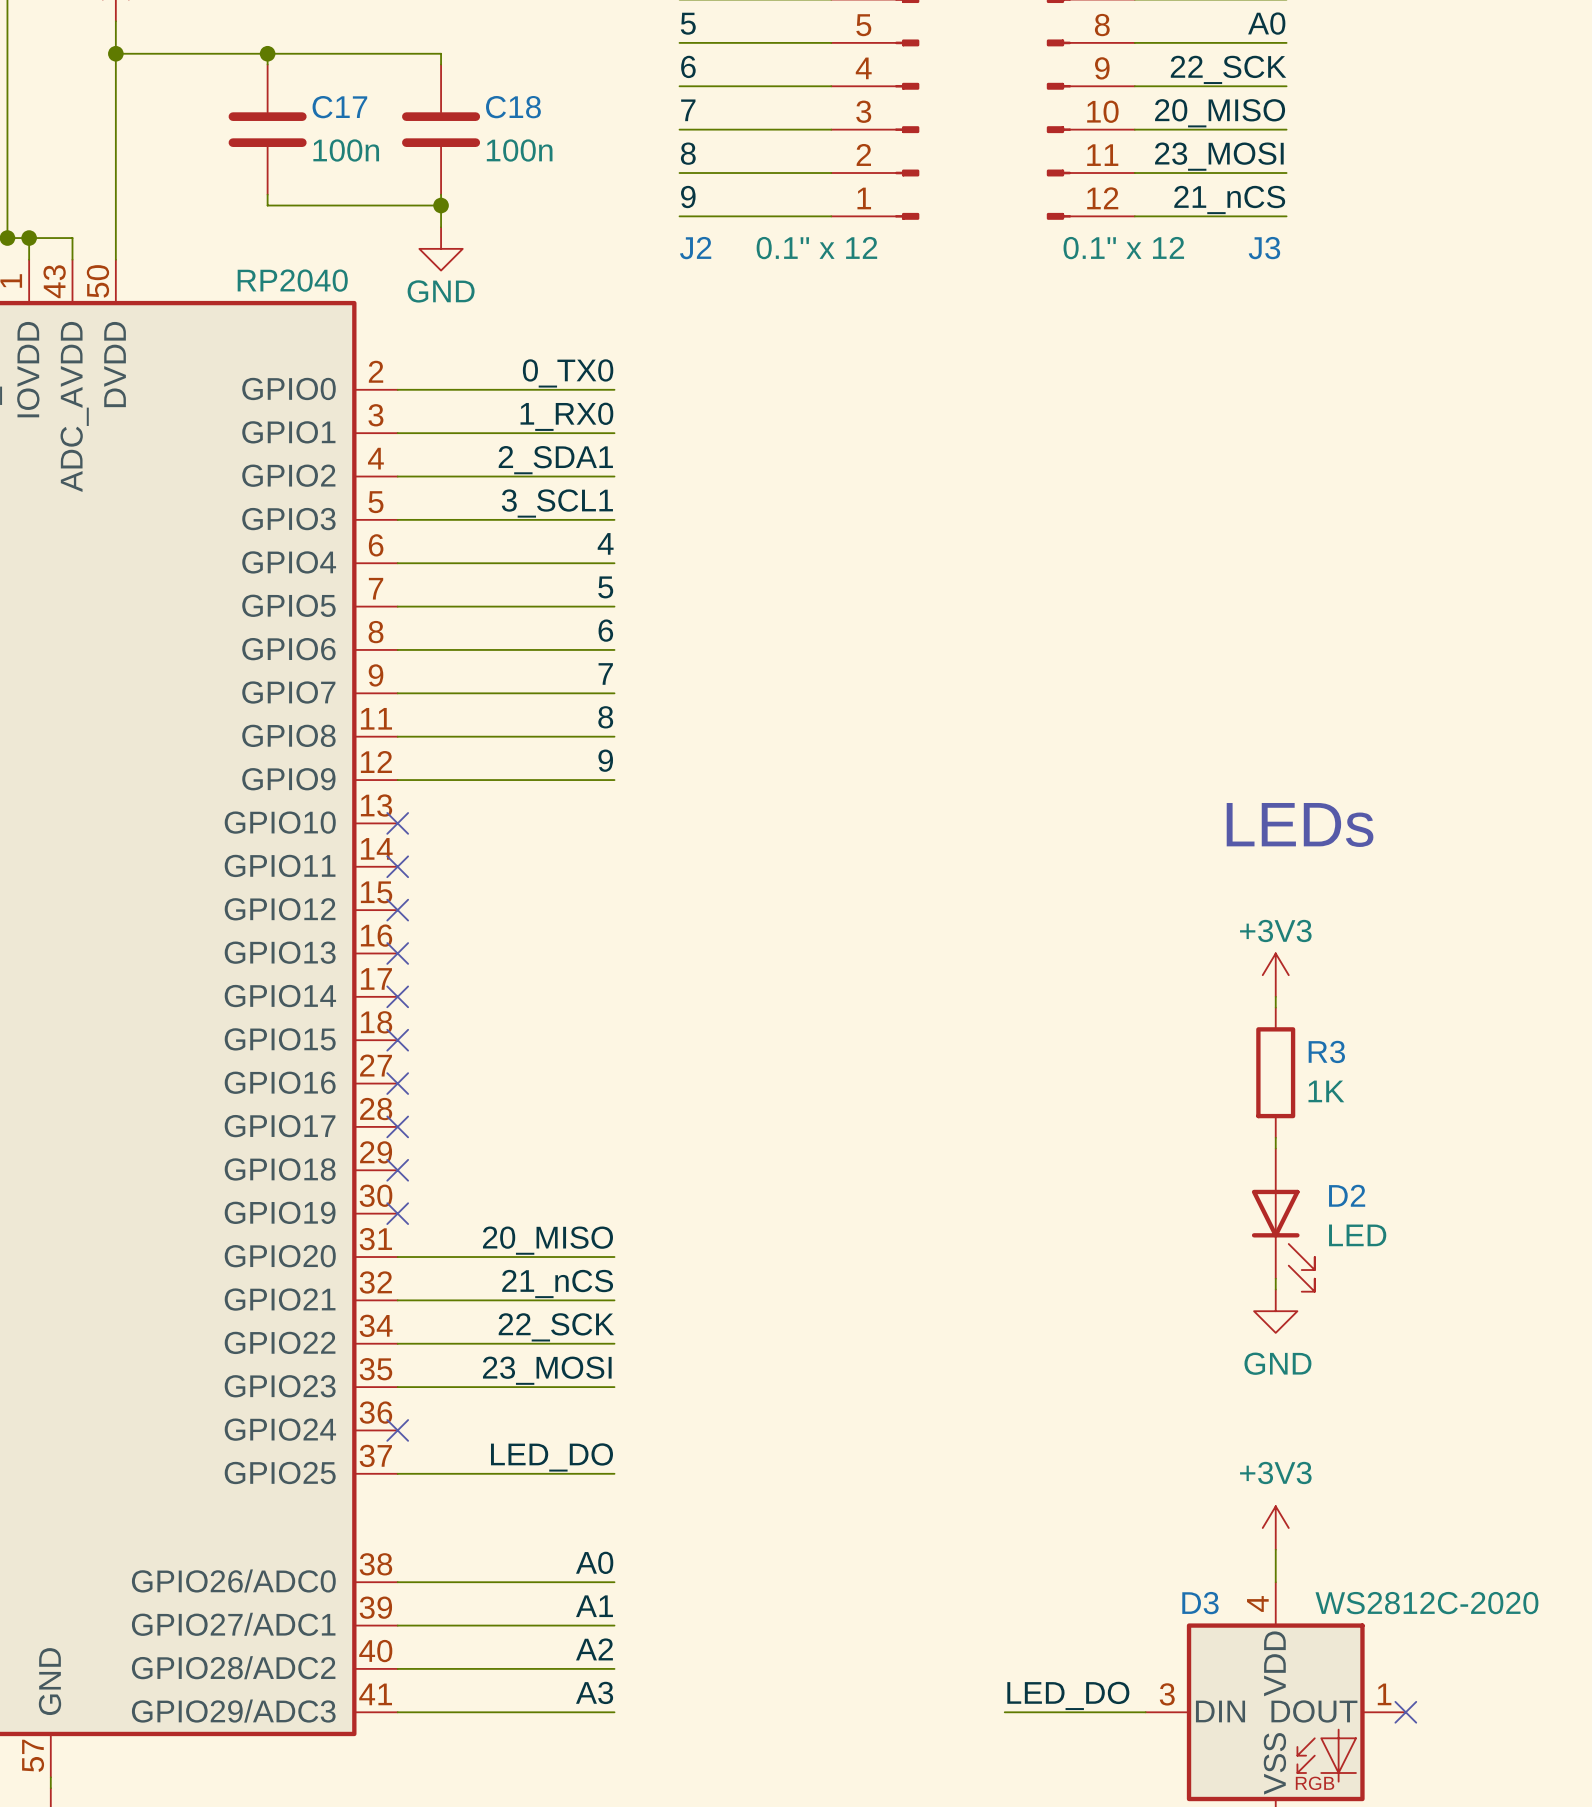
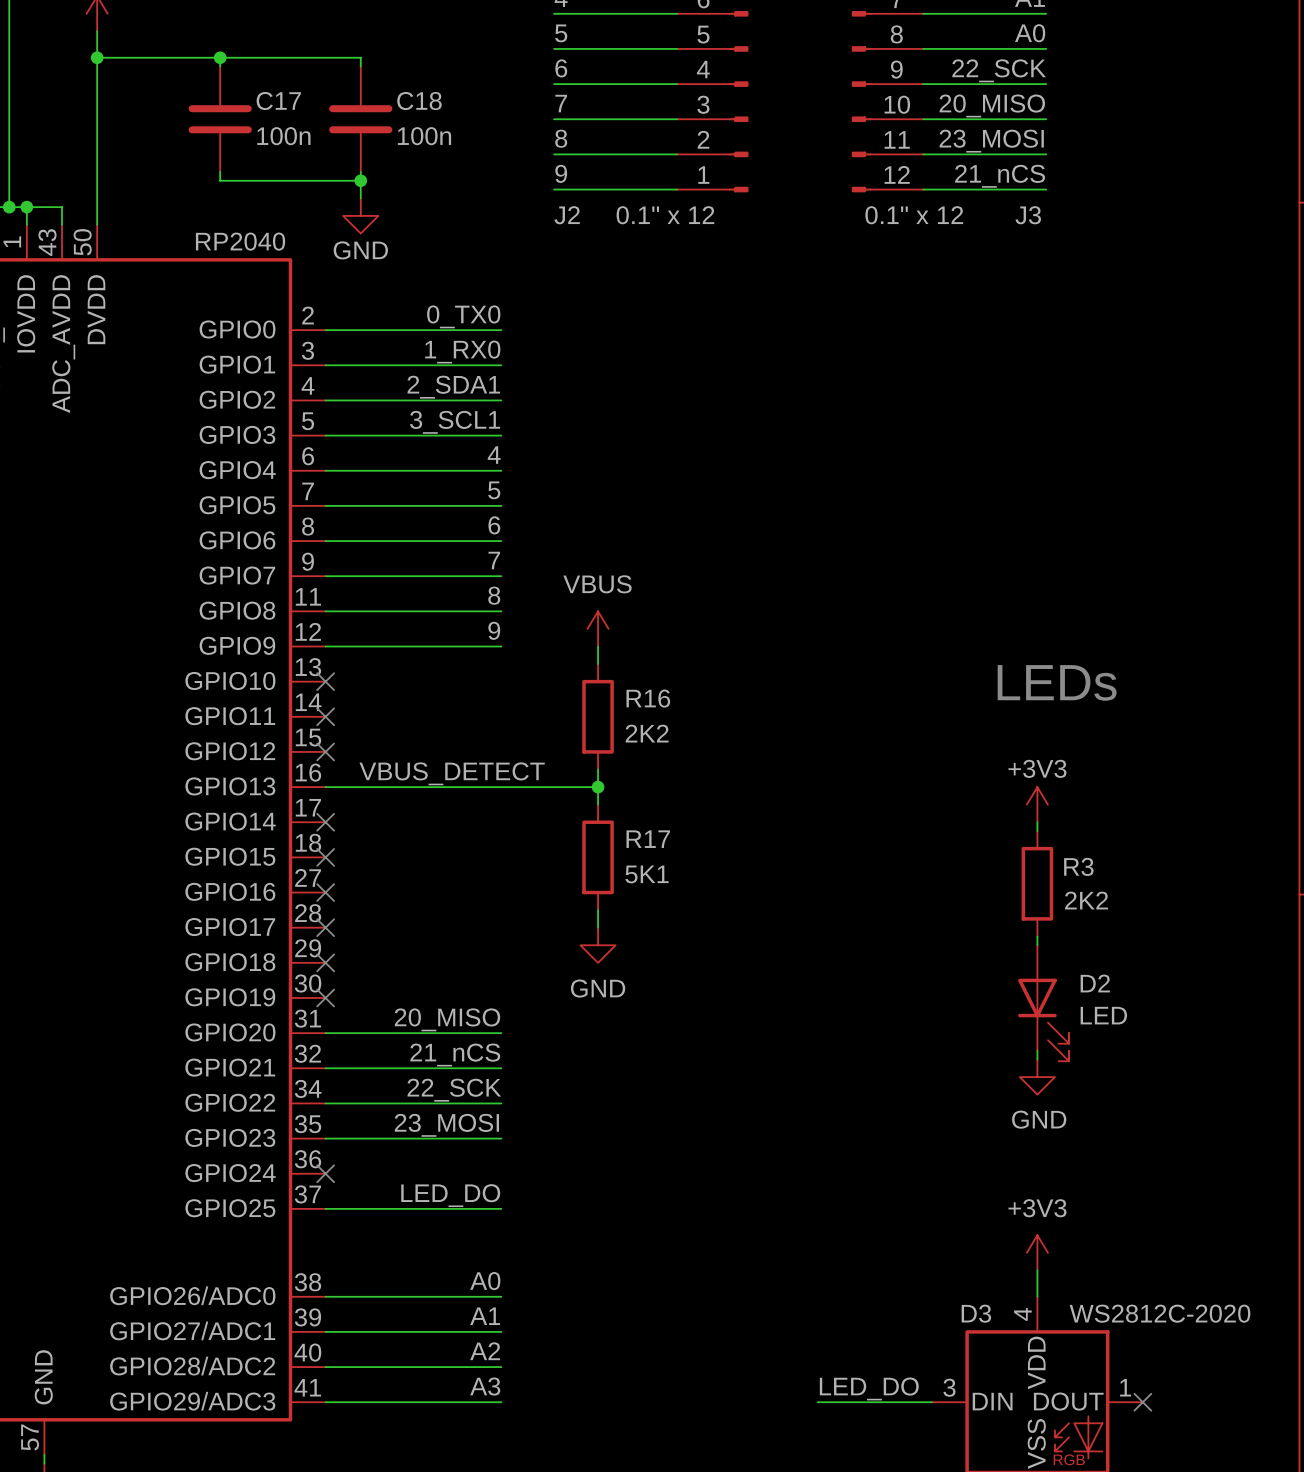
power symbol: none -> VBUS (598, 628)
wire: none -> (598, 646) (598, 664)
R16: none -> 2K2 (598, 716)
wire: none -> (598, 769) (598, 804)
label: none -> VBUS_DETECT (452, 773)
wire: none -> (325, 787) (598, 787)
no-connect mark: (397, 953) -> none
junction: none -> (598, 787)
R17: none -> 5K1 (598, 857)
R3 value: 1K (1326, 1091) -> 2K2 (1086, 900)
wire: none -> (598, 910) (598, 927)
power symbol: none -> GND (598, 945)

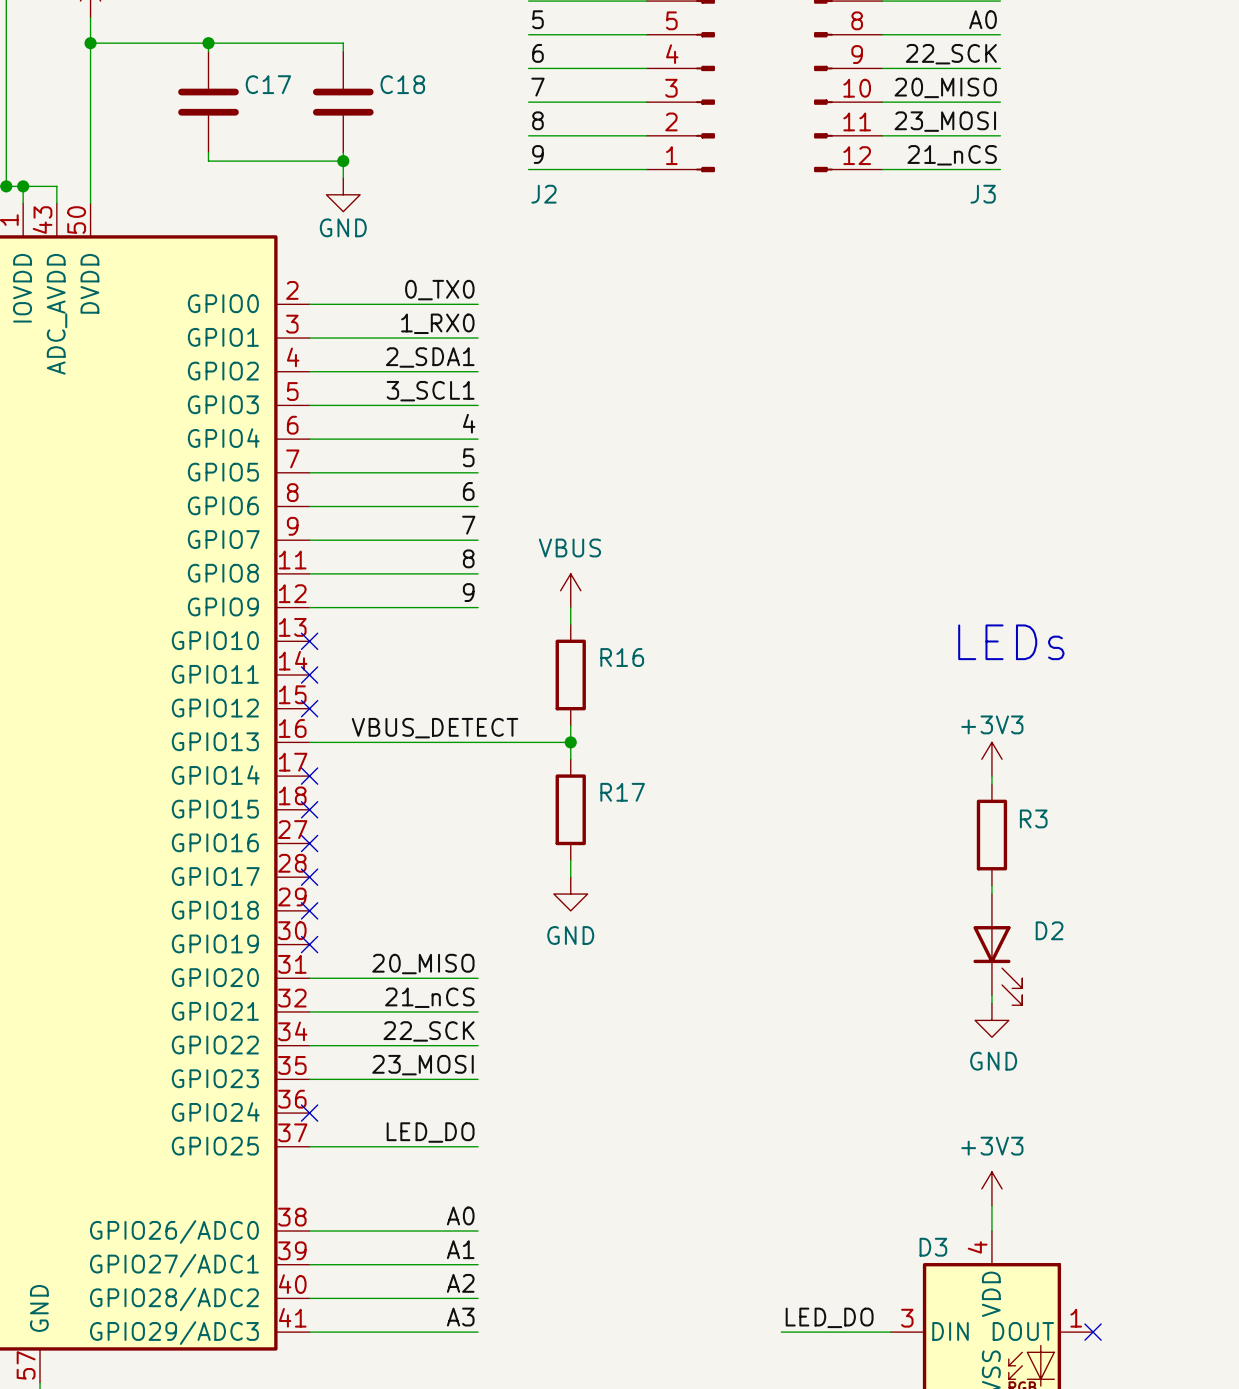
C17 value: 100n (283, 136) -> none
C18 value: 100n (424, 136) -> none
J2 value: 0.1" x 12 (665, 215) -> none
J3 value: 0.1" x 12 (914, 215) -> none
part value: RP2040 (240, 241) -> none
R16 value: 2K2 (647, 733) -> none
R17 value: 5K1 (647, 874) -> none
R3 value: 2K2 (1086, 900) -> none
D2 value: LED (1103, 1015) -> none
D3 value: WS2812C-2020 (1159, 1313) -> none

